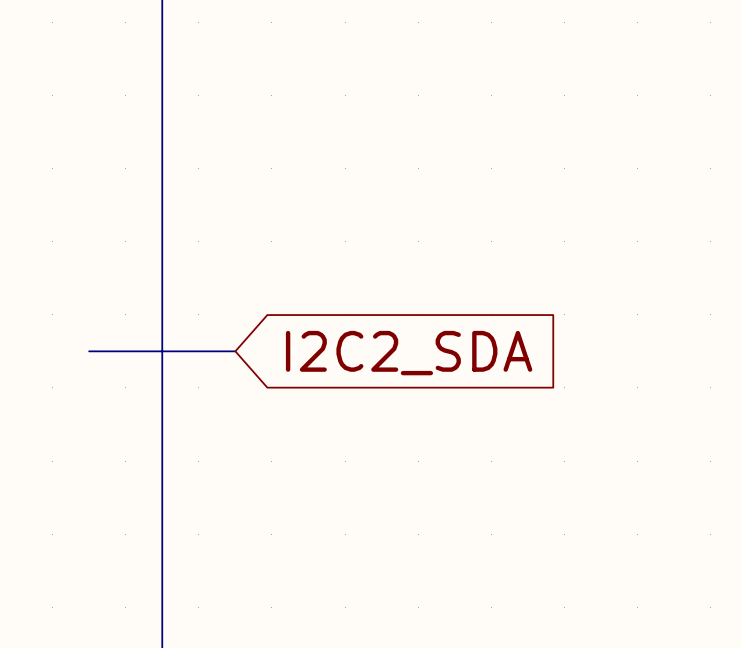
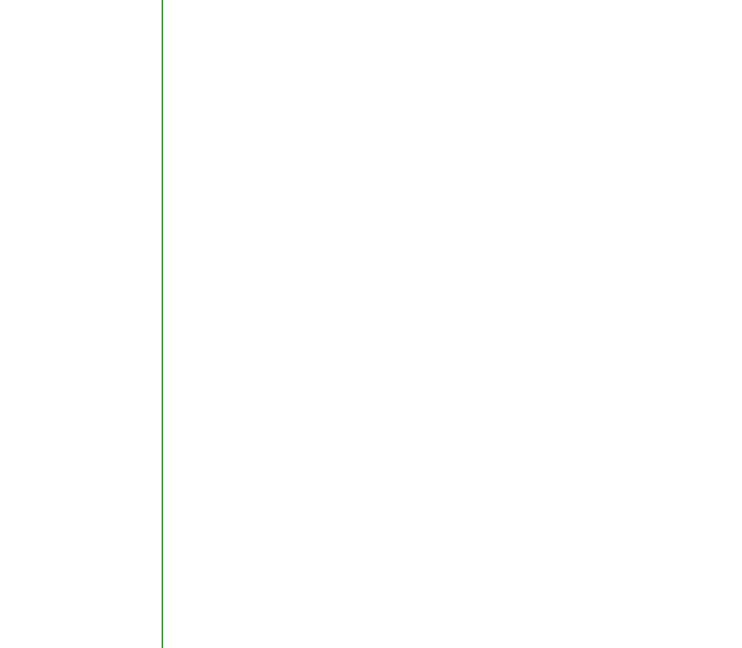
wire: (89, 351) (235, 351) -> none
global label: I2C2_SDA (409, 353) -> none

